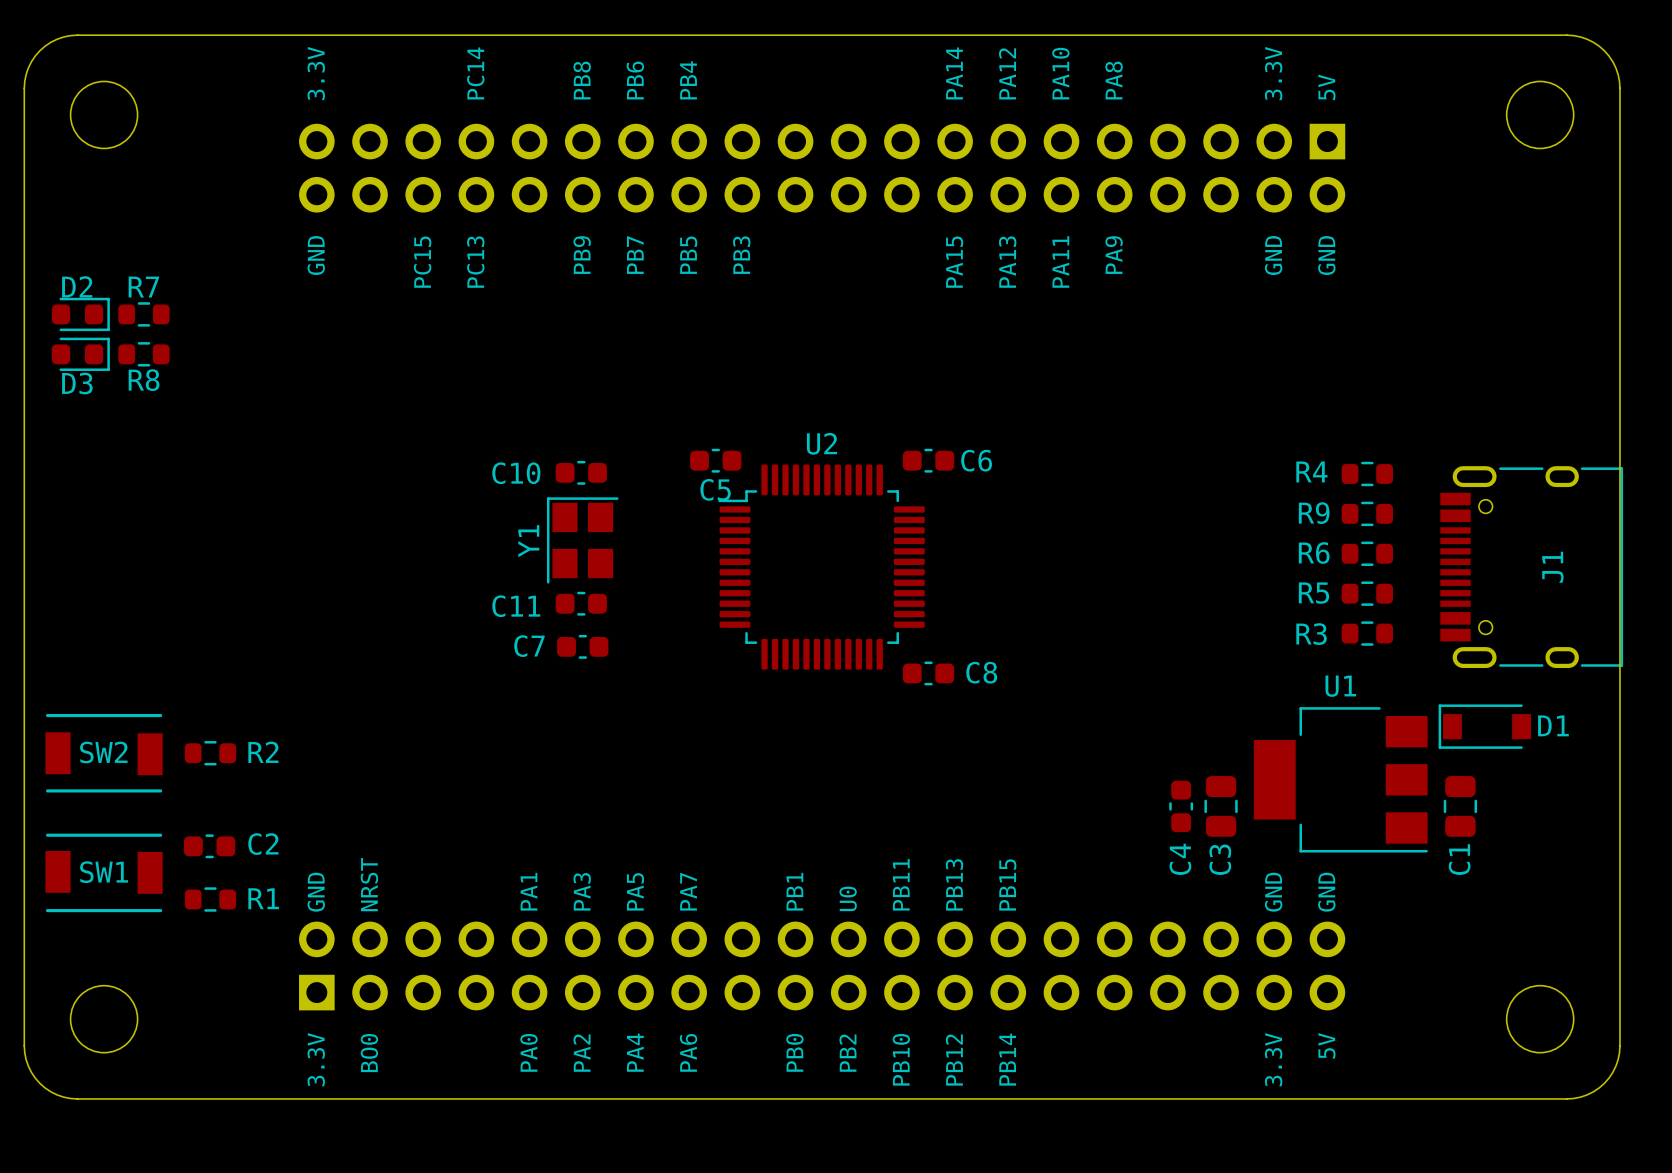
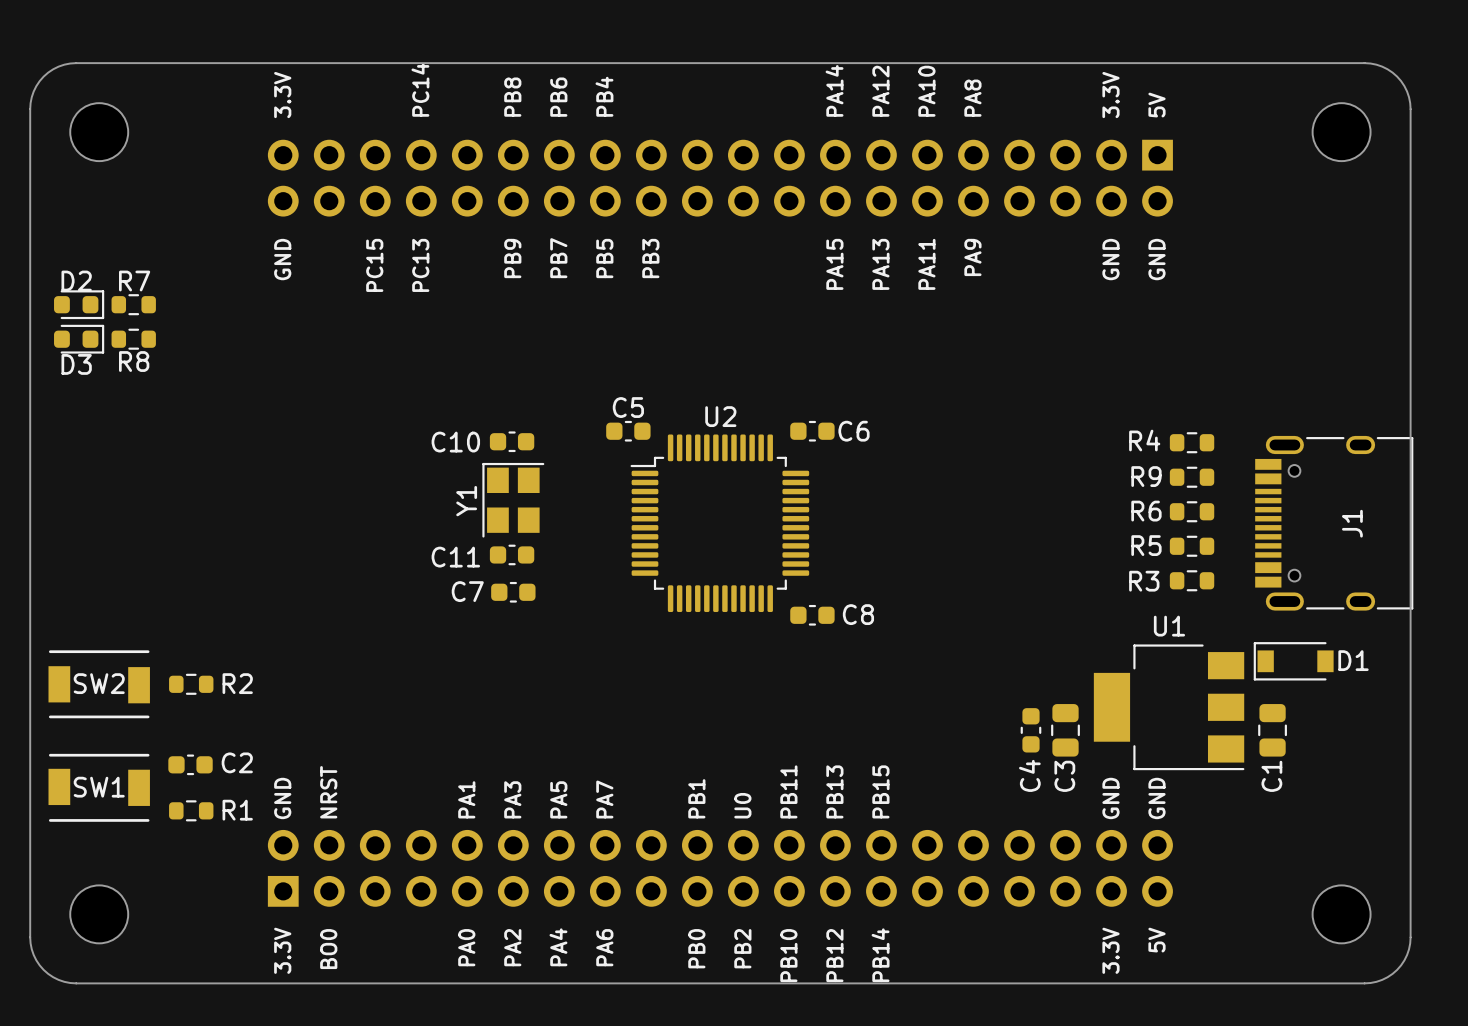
C5 name position: C5 (715, 489) -> C5 (628, 407)

